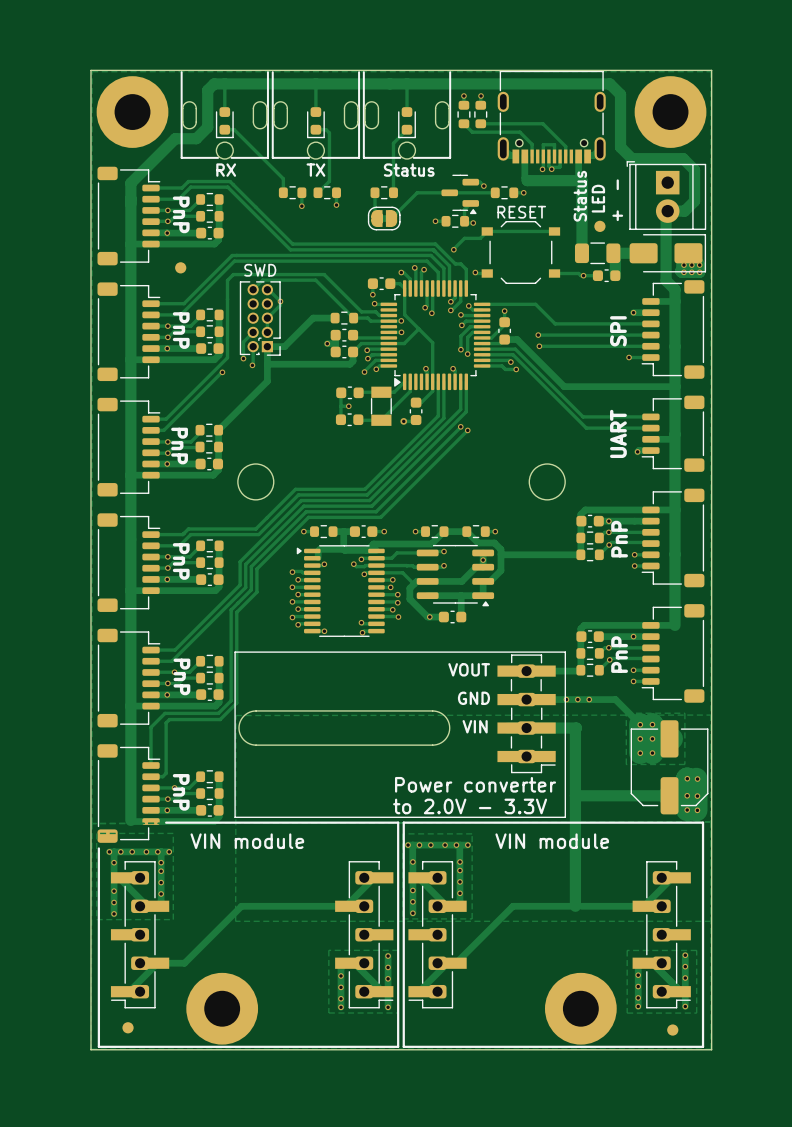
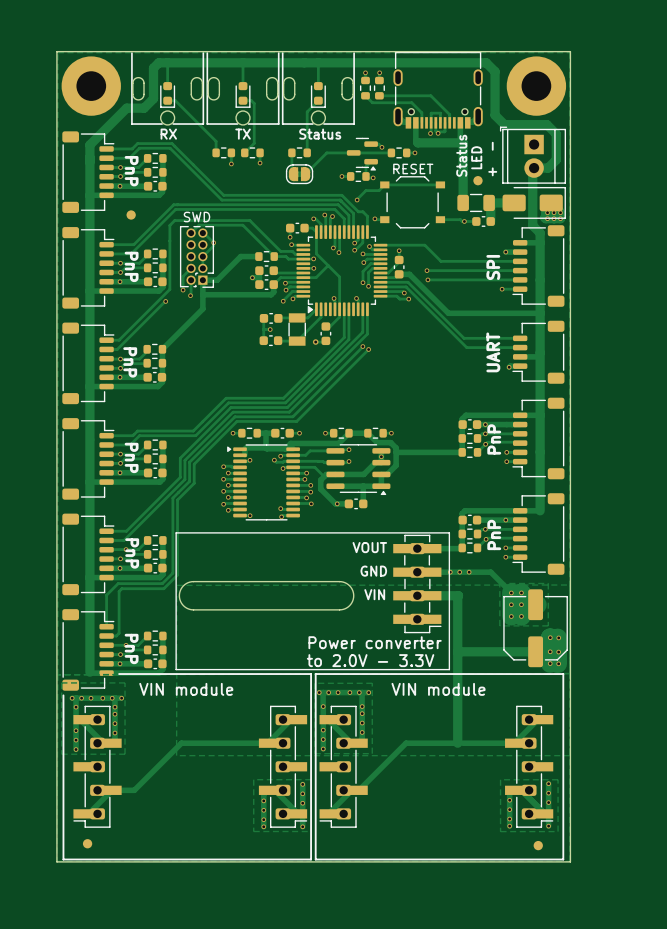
round board edge: [237, 463, 275, 501] -> none
round board edge: [528, 463, 566, 501] -> none
part: (222, 1008) -> none
part: (580, 1008) -> none

